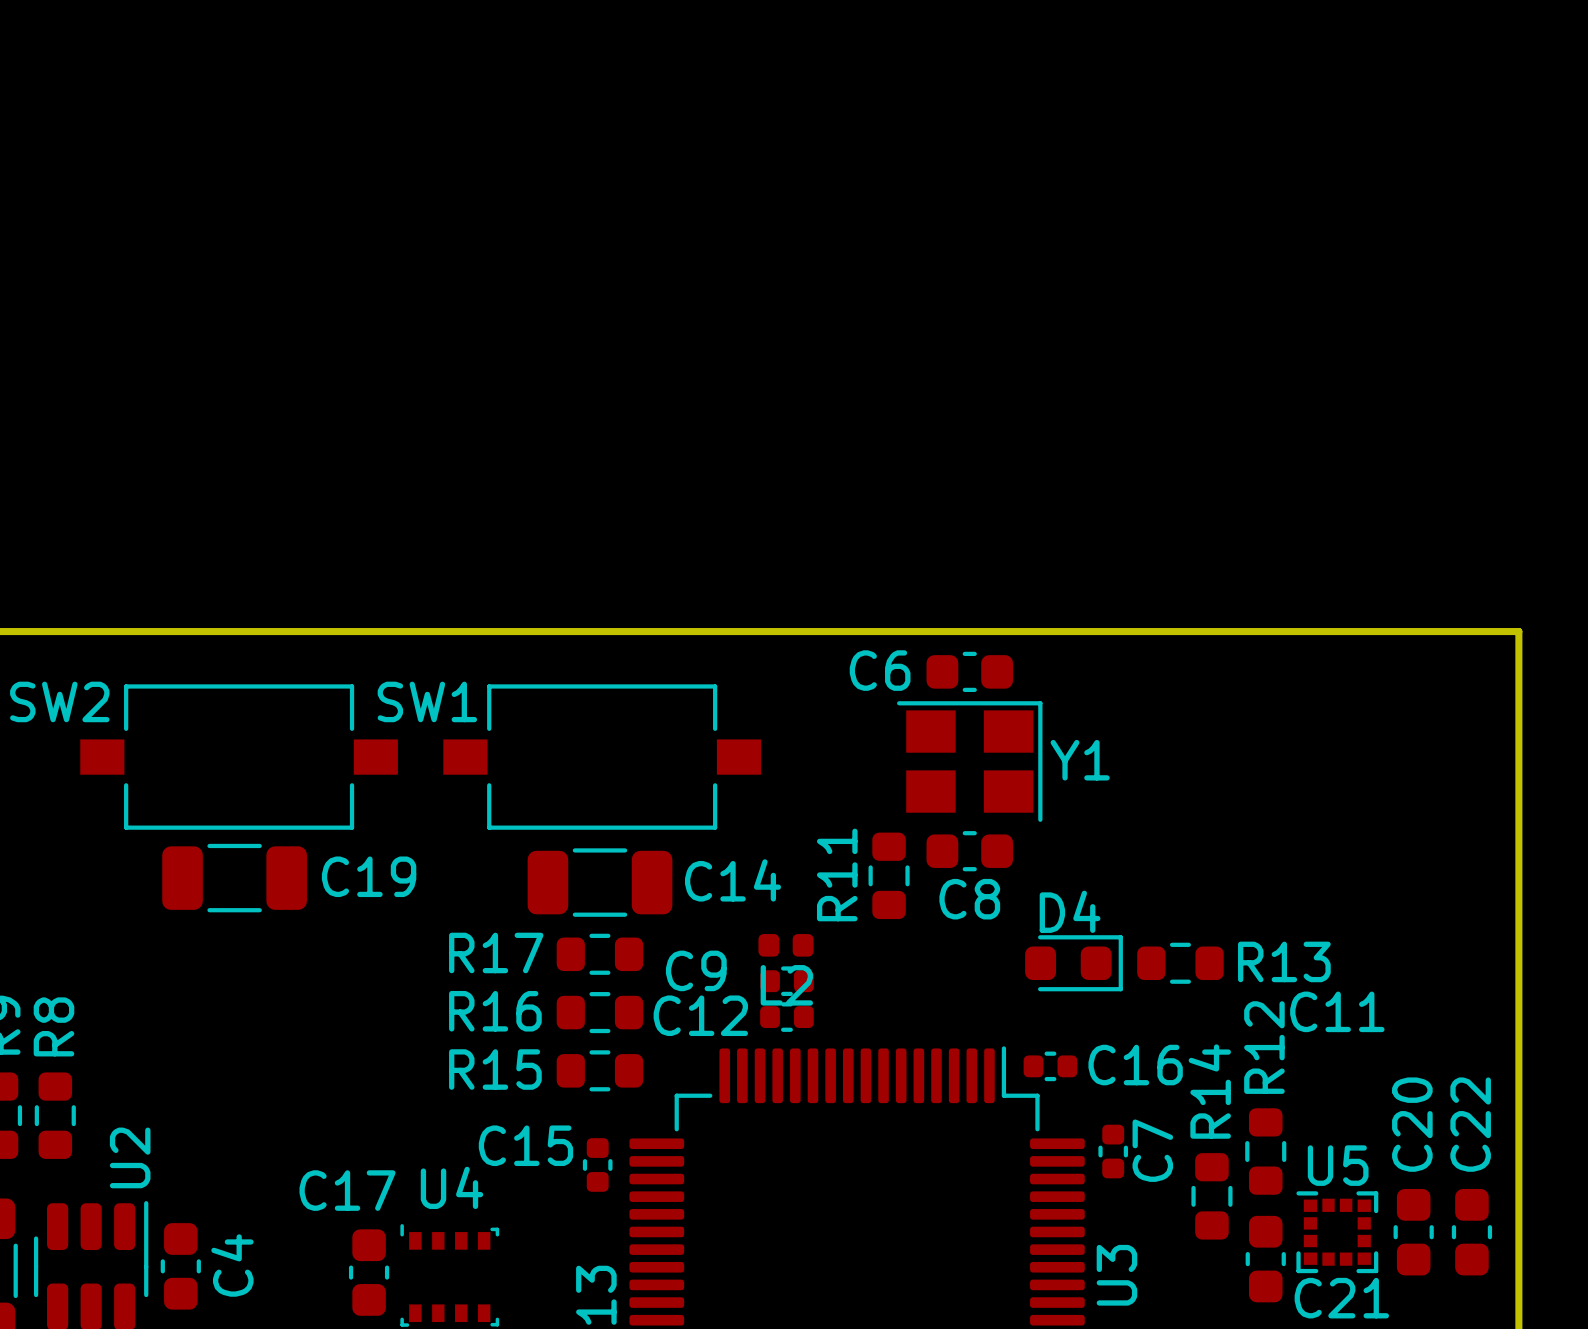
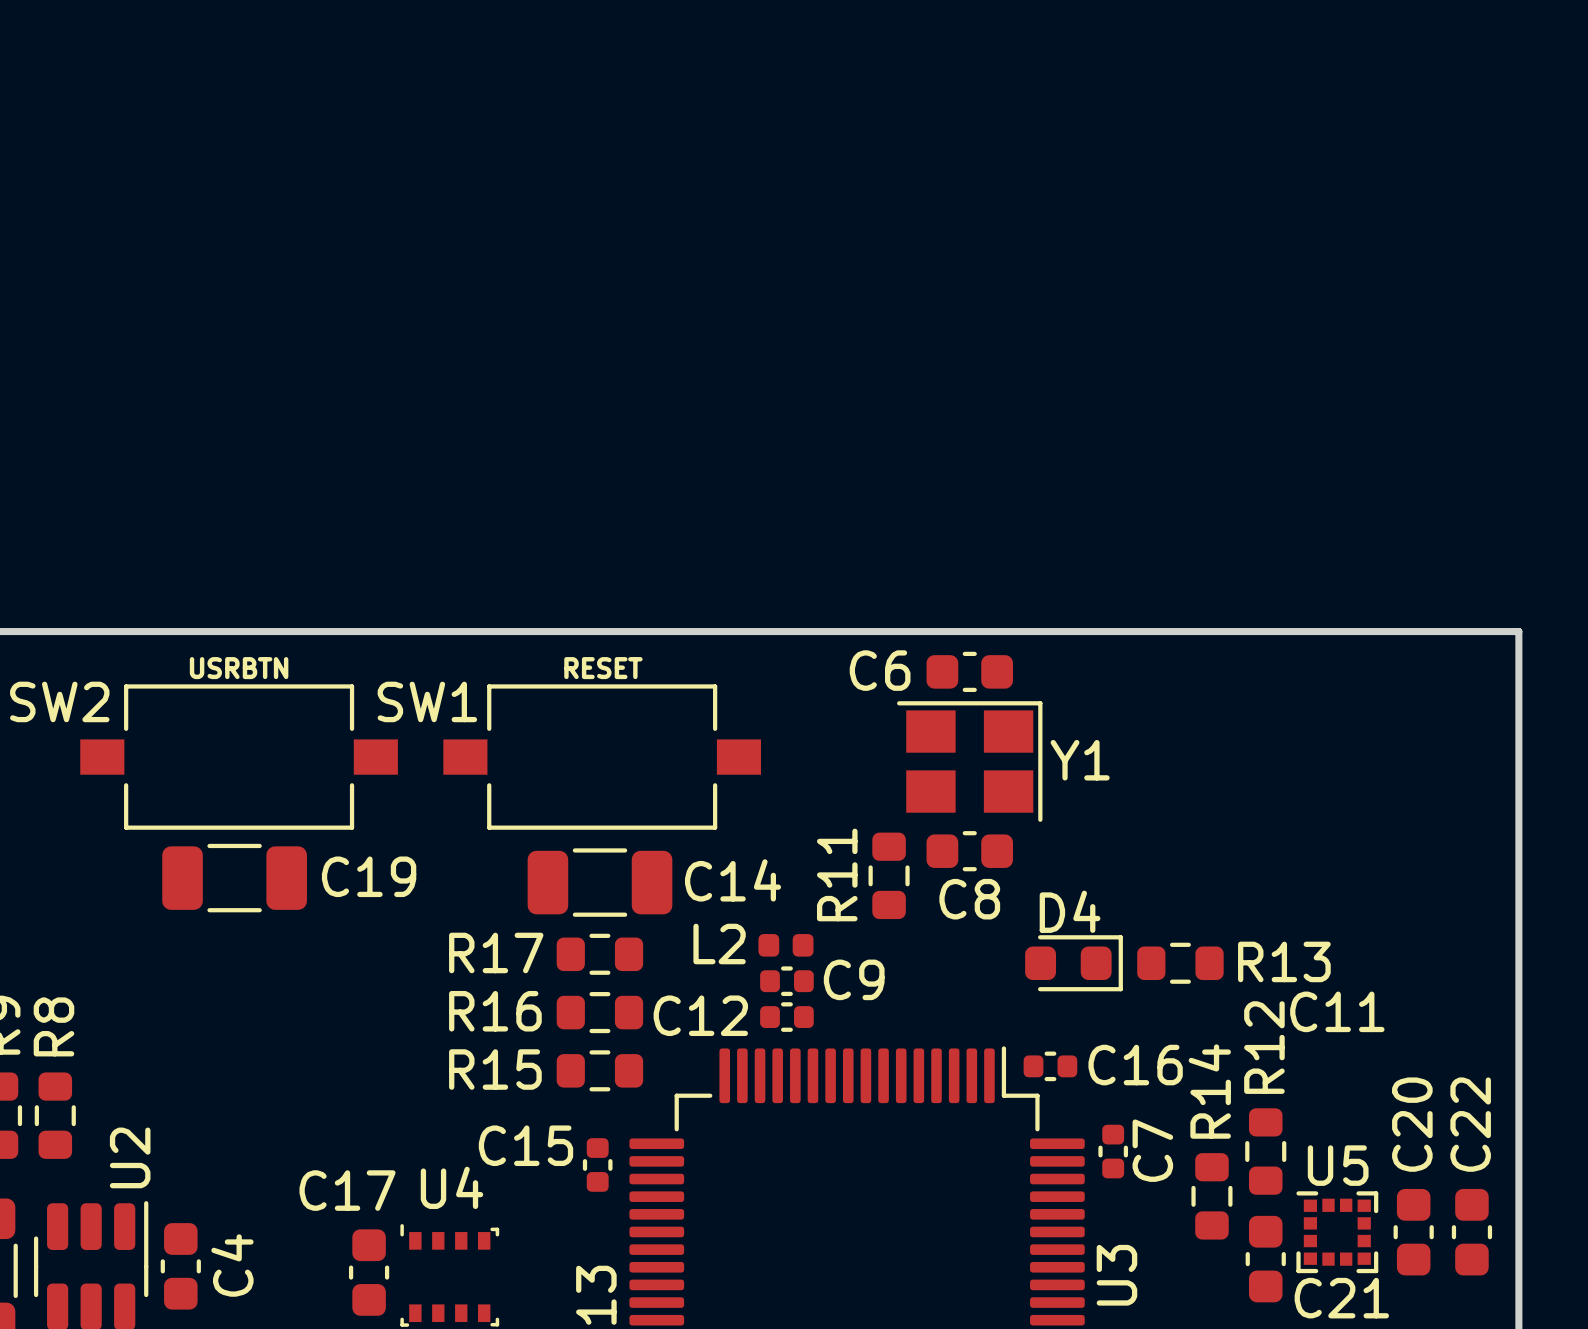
text: none -> USRBTN (239, 668)
text: none -> RESET (603, 668)
C9 name position: C9 (696, 970) -> C9 (854, 979)
L2 name position: L2 (786, 985) -> L2 (719, 944)

